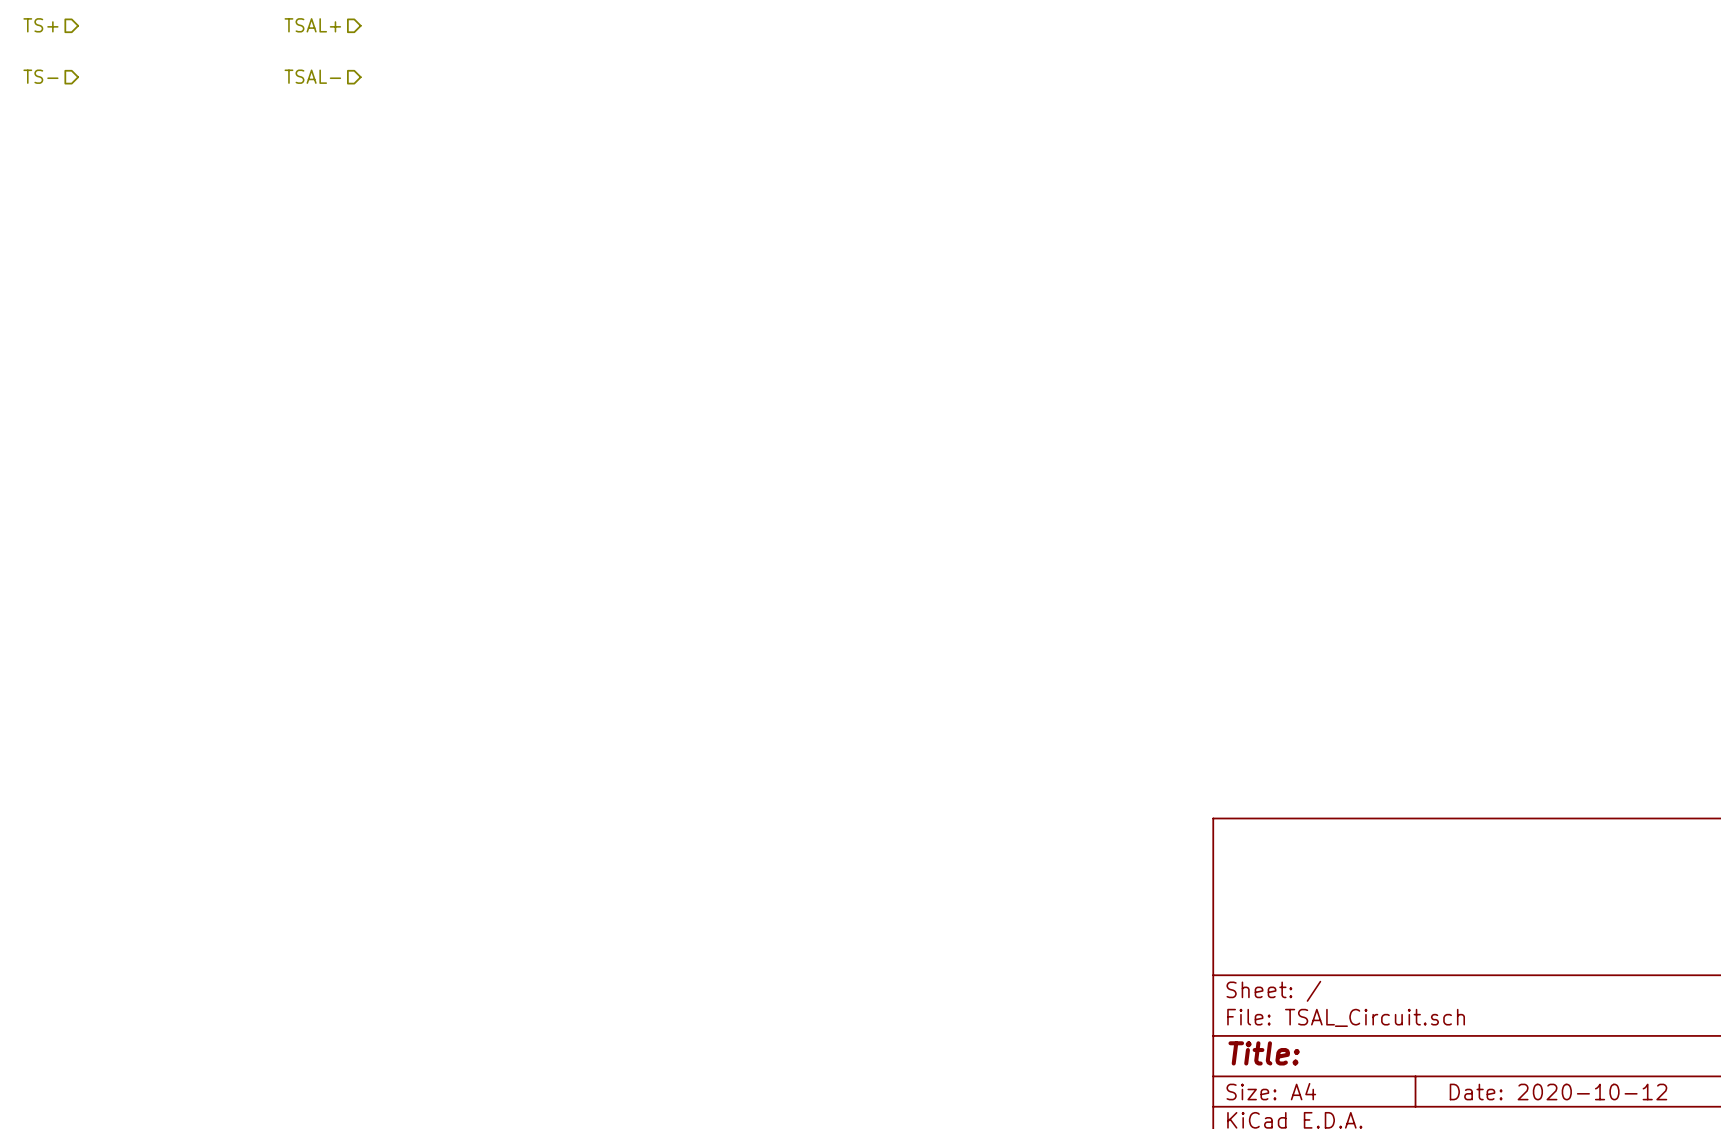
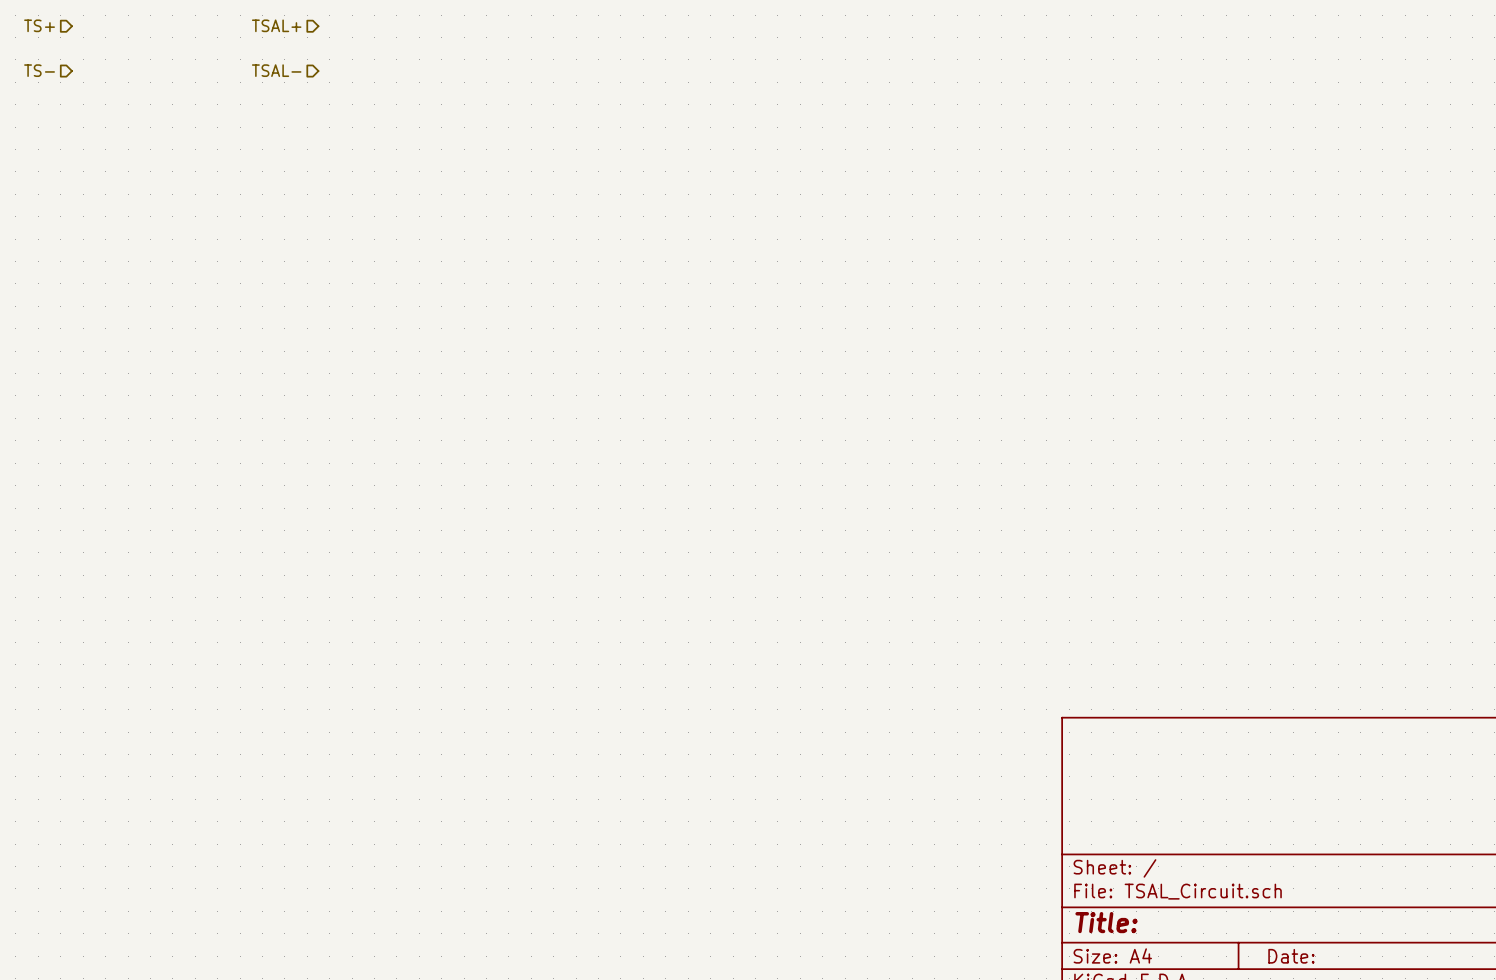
title block: Date: 2020-10-12 (1558, 1092) -> Date: (1291, 956)

